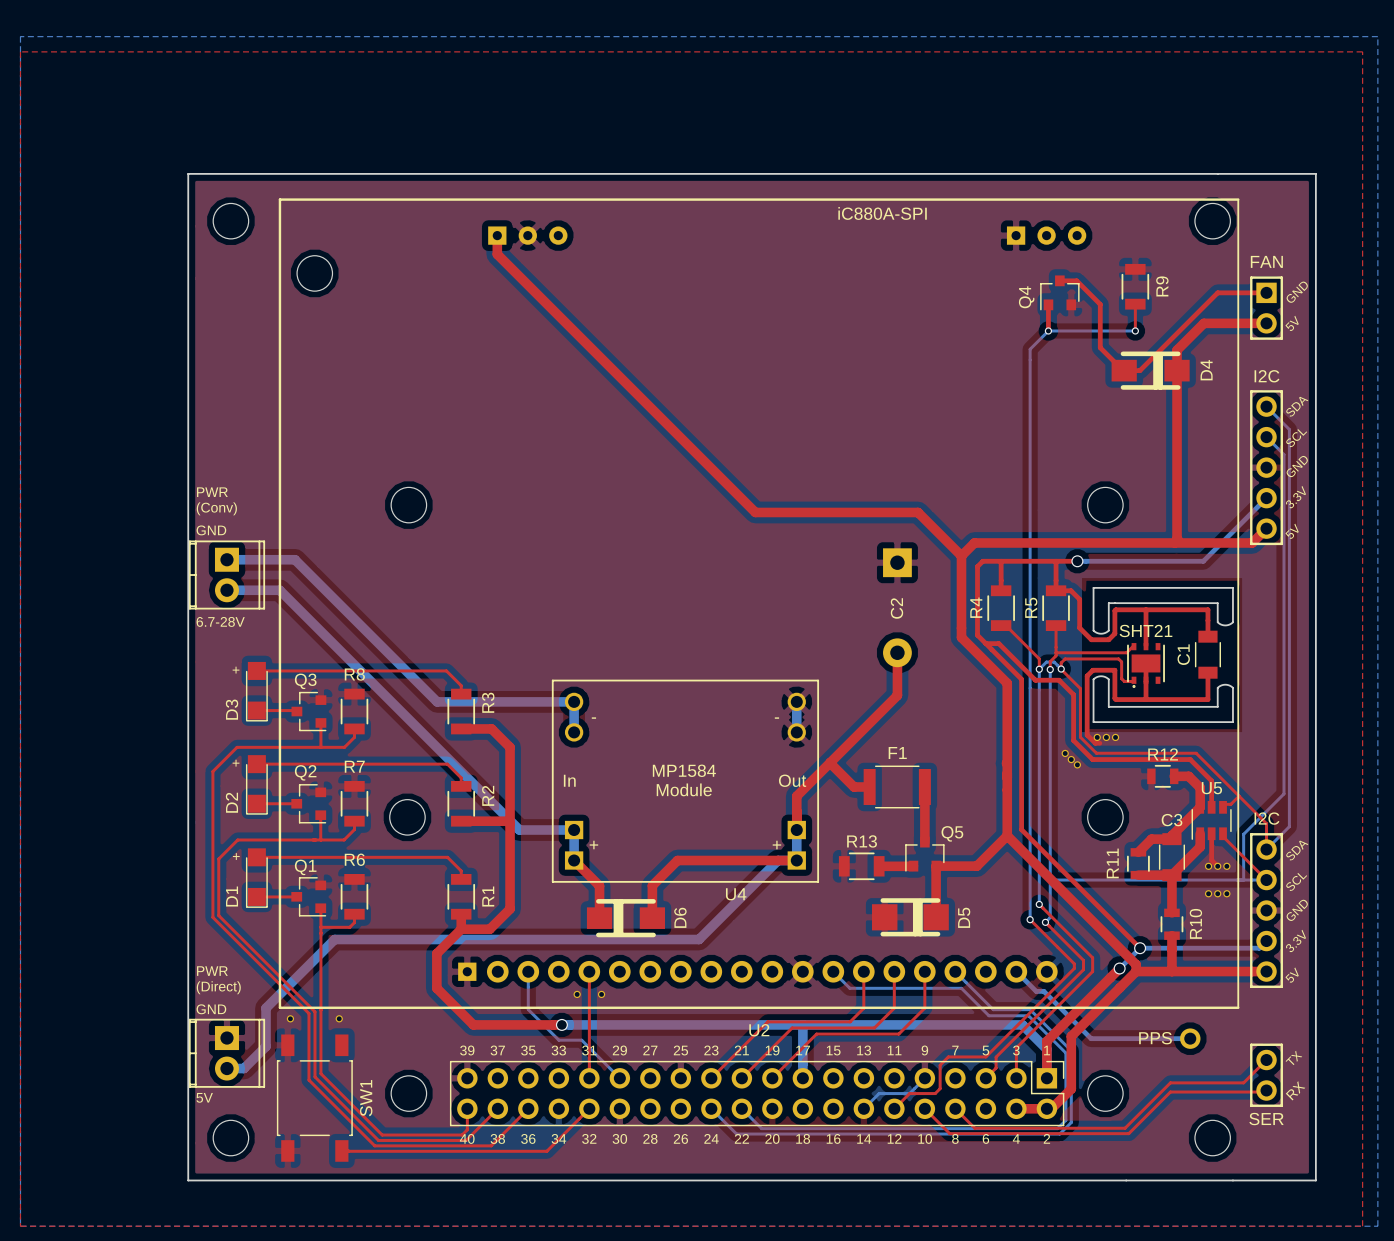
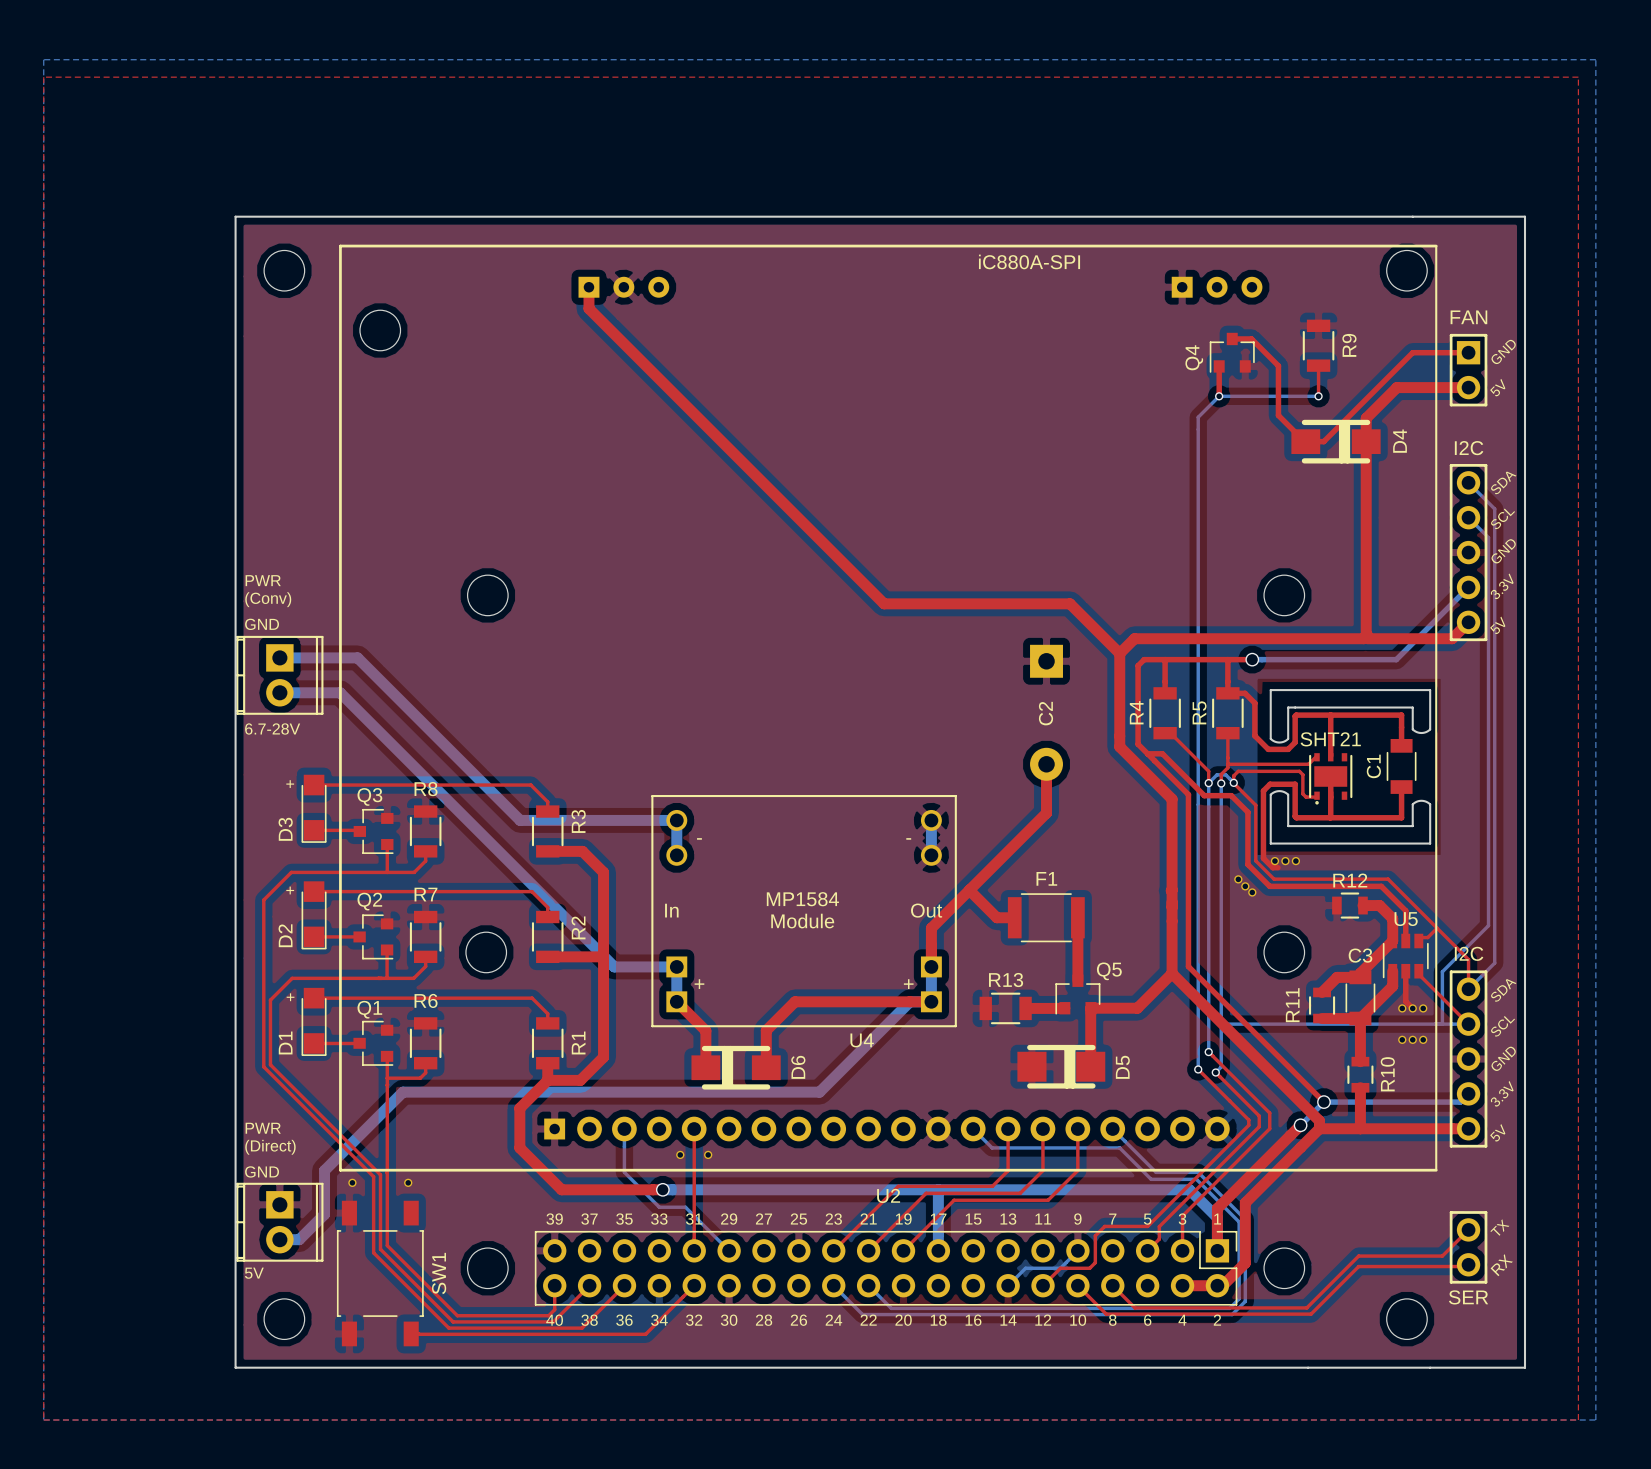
bottom track: (1016, 971) (1036, 991) (1043, 991) (1091, 1038) (1190, 1038) -> none
part: PPS (1190, 1038) -> none

